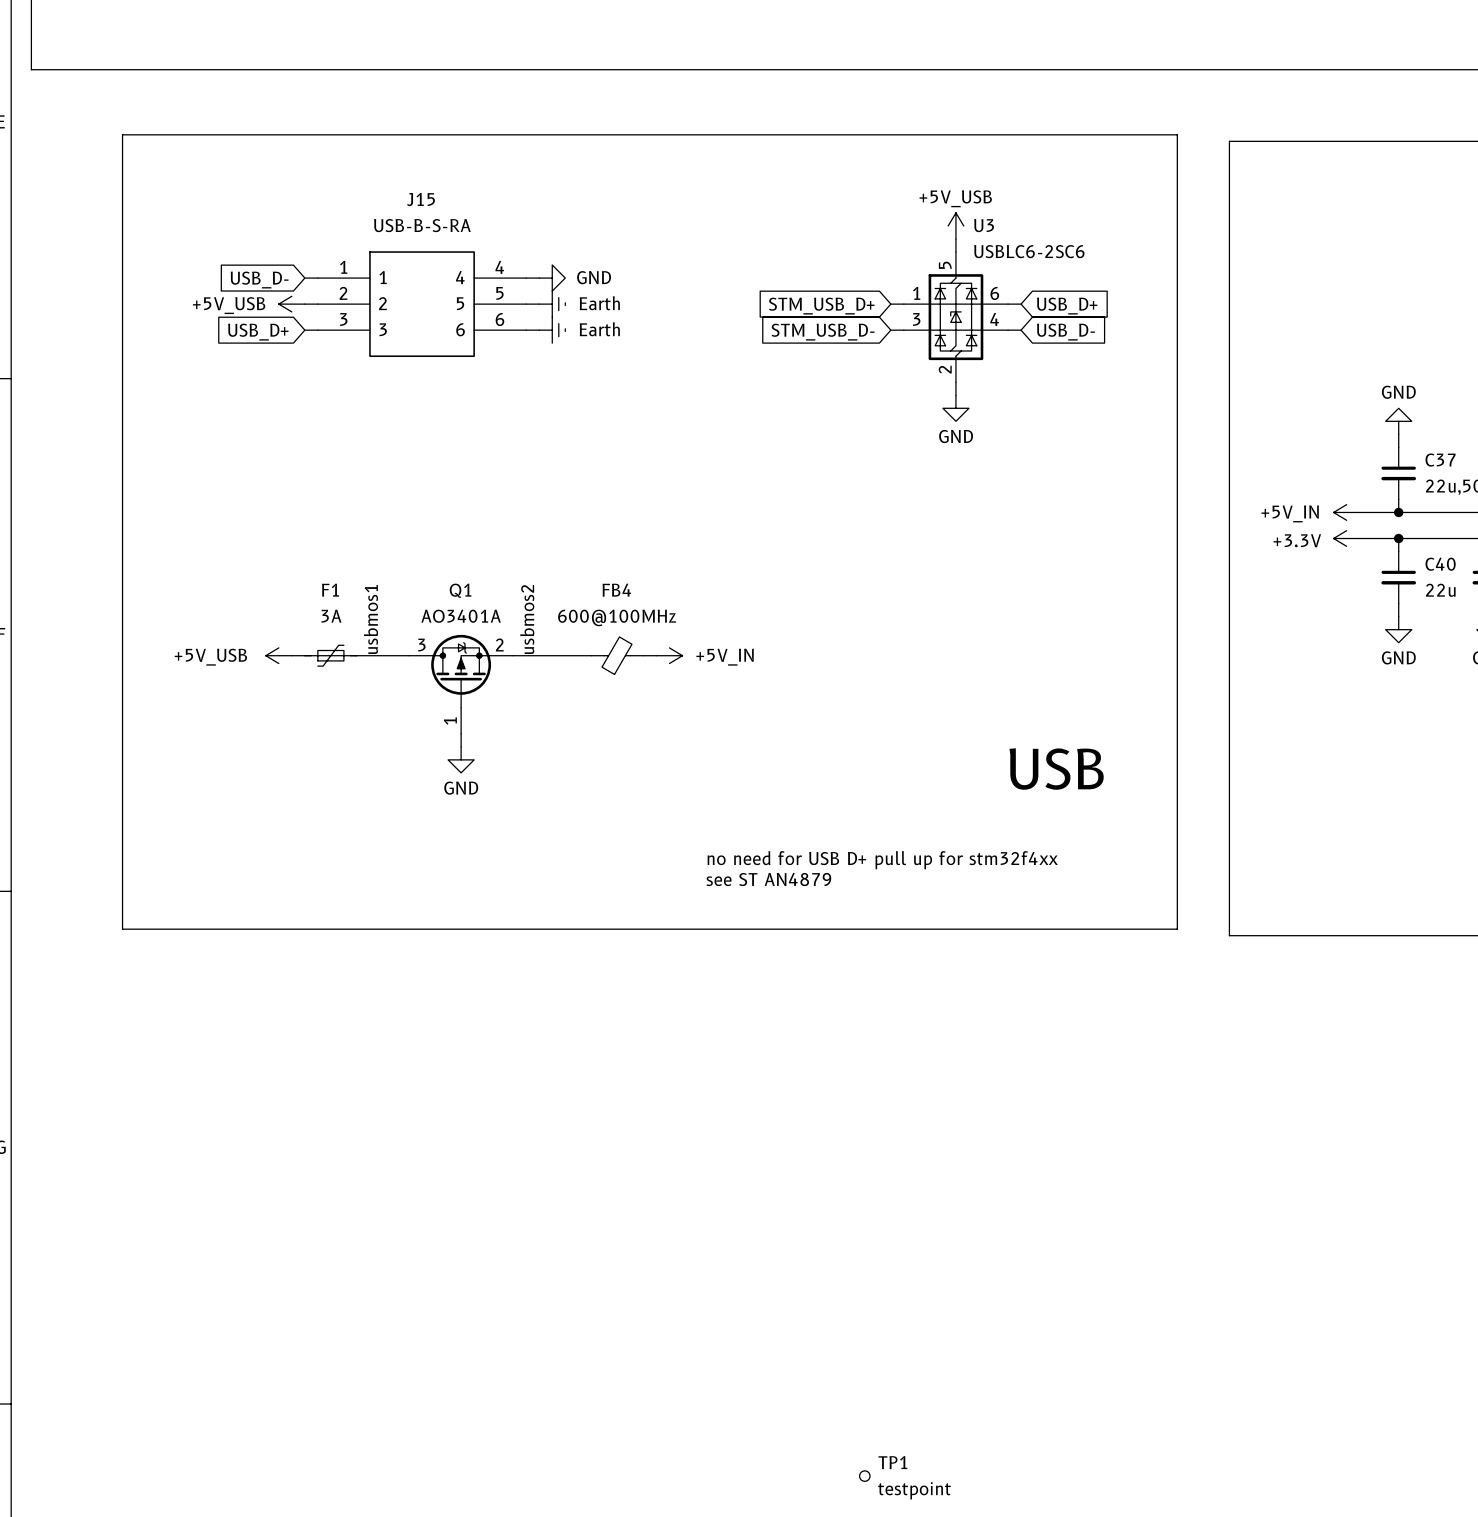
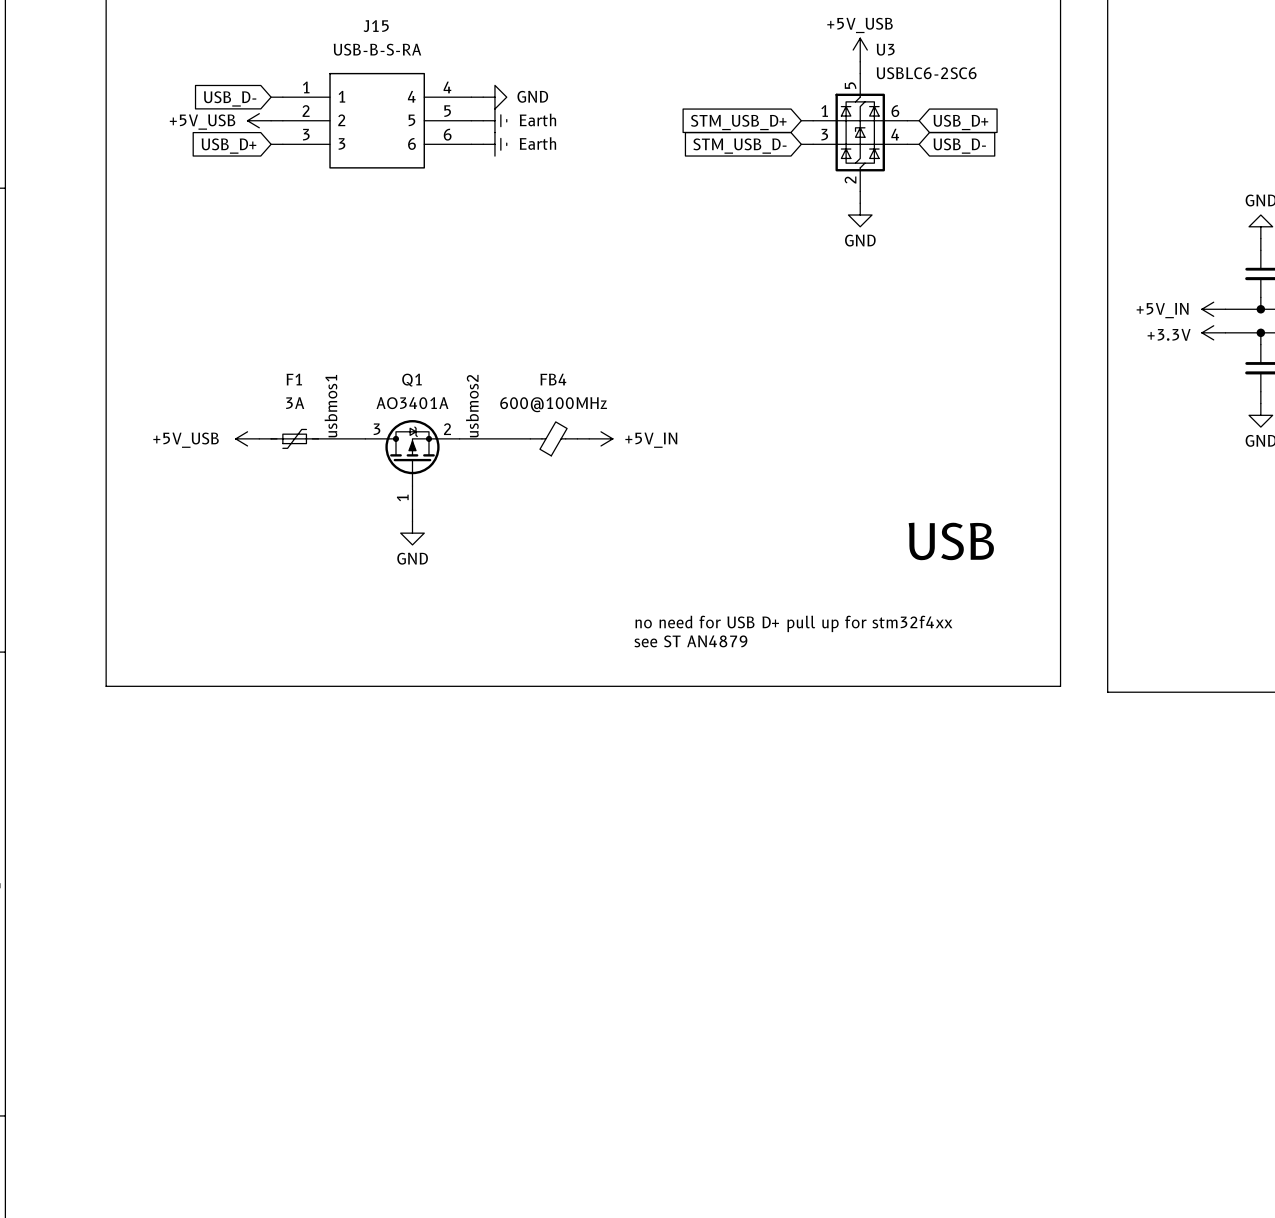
TP1: testpoint (864, 1476) -> none

